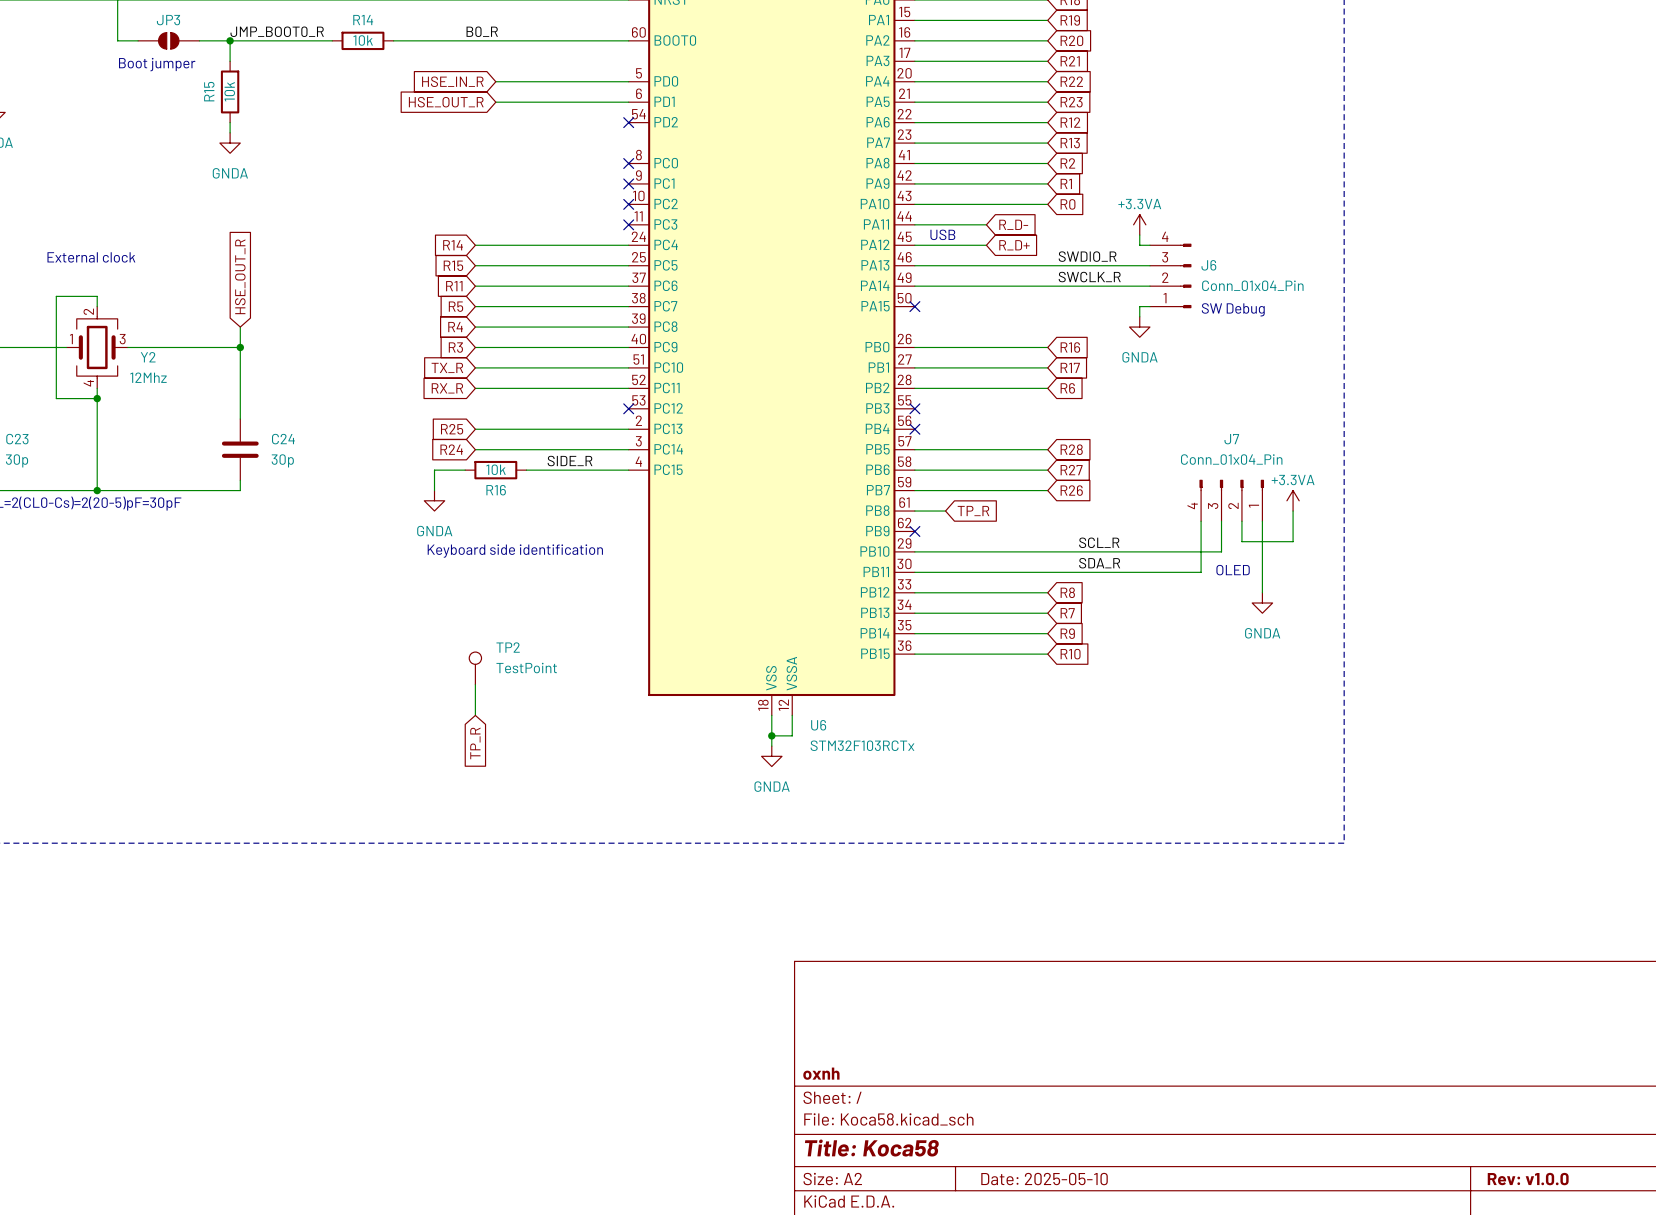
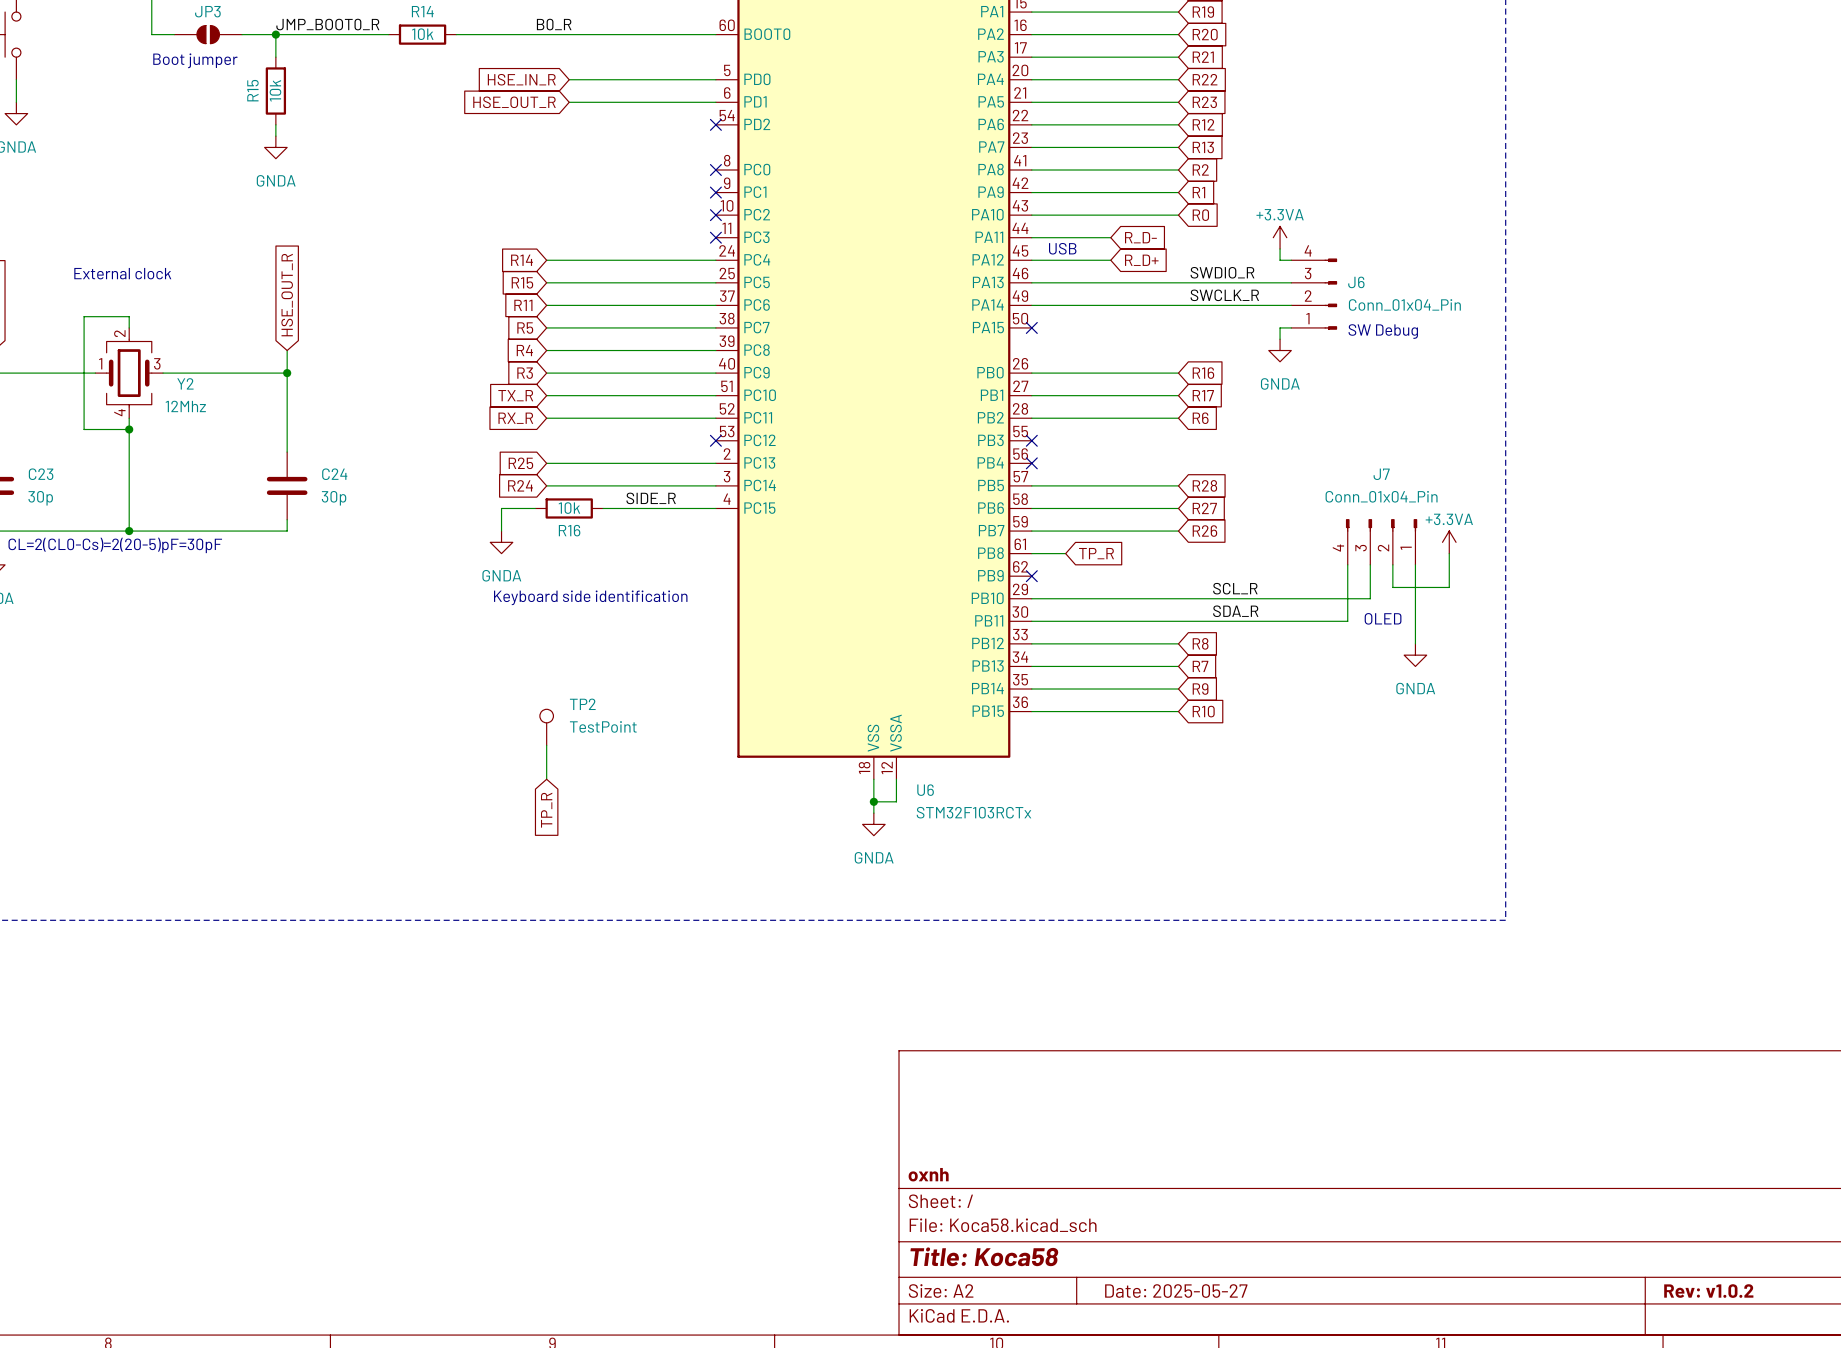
title block: Date: 2025-05-10 (1044, 1179) -> Date: 2025-05-27 (1176, 1291)
title block: Rev: v1.0.0 (1528, 1179) -> Rev: v1.0.2 (1708, 1291)

